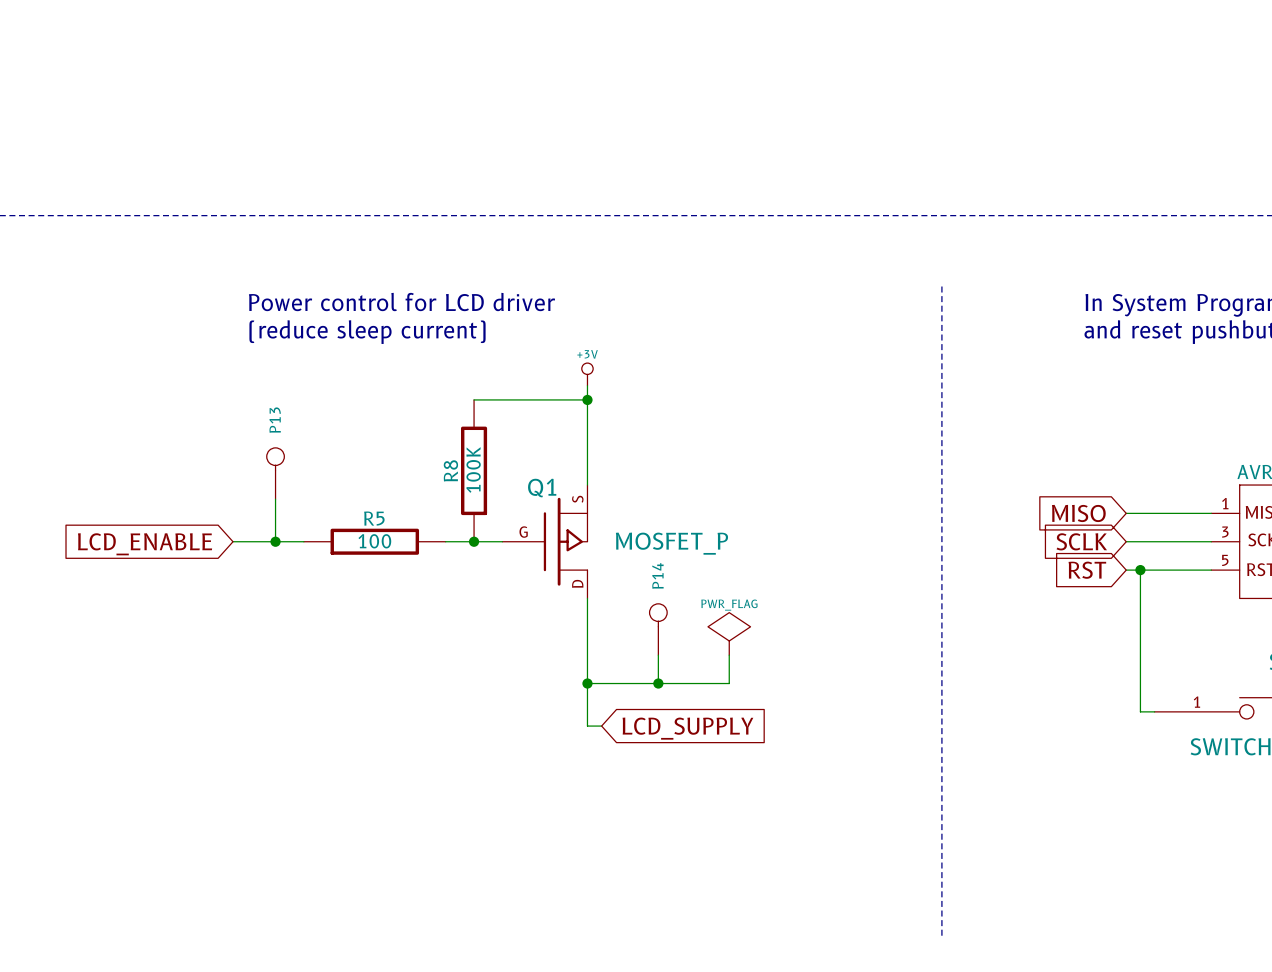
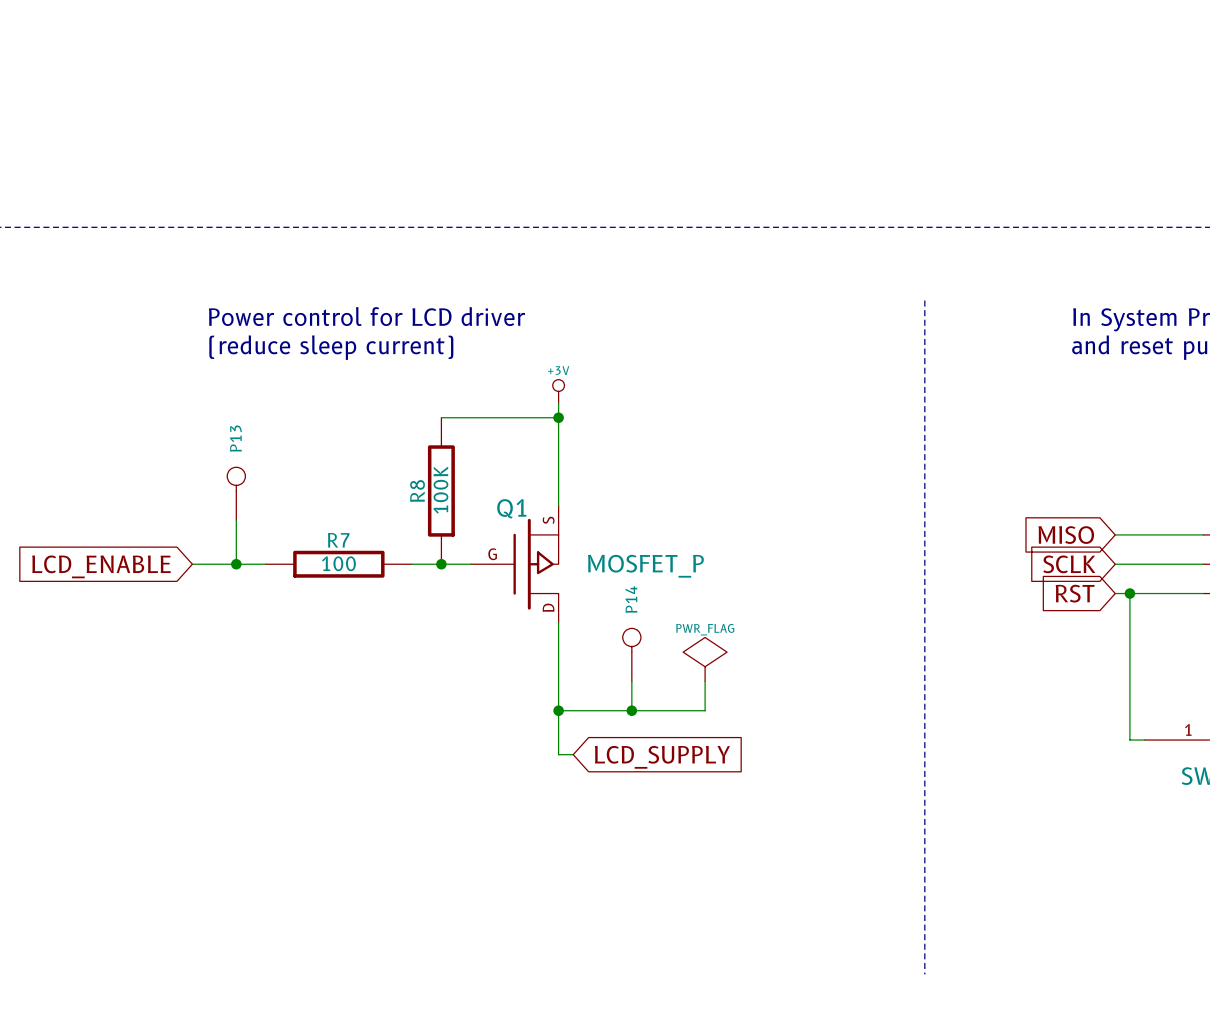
R5 name: R5 (374, 518) -> R7 (338, 540)

